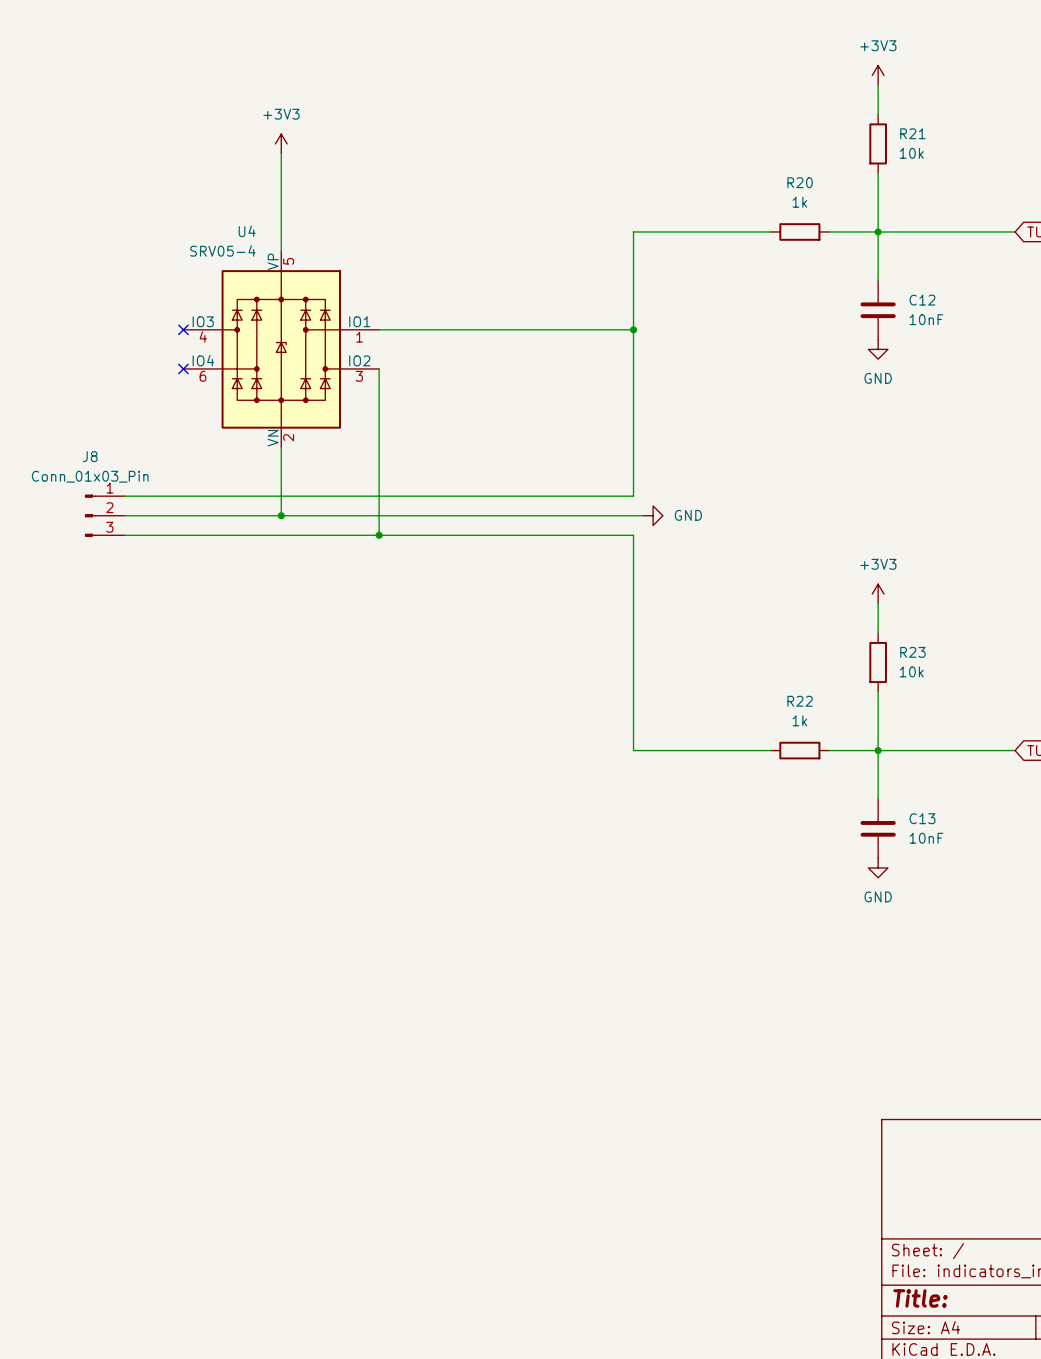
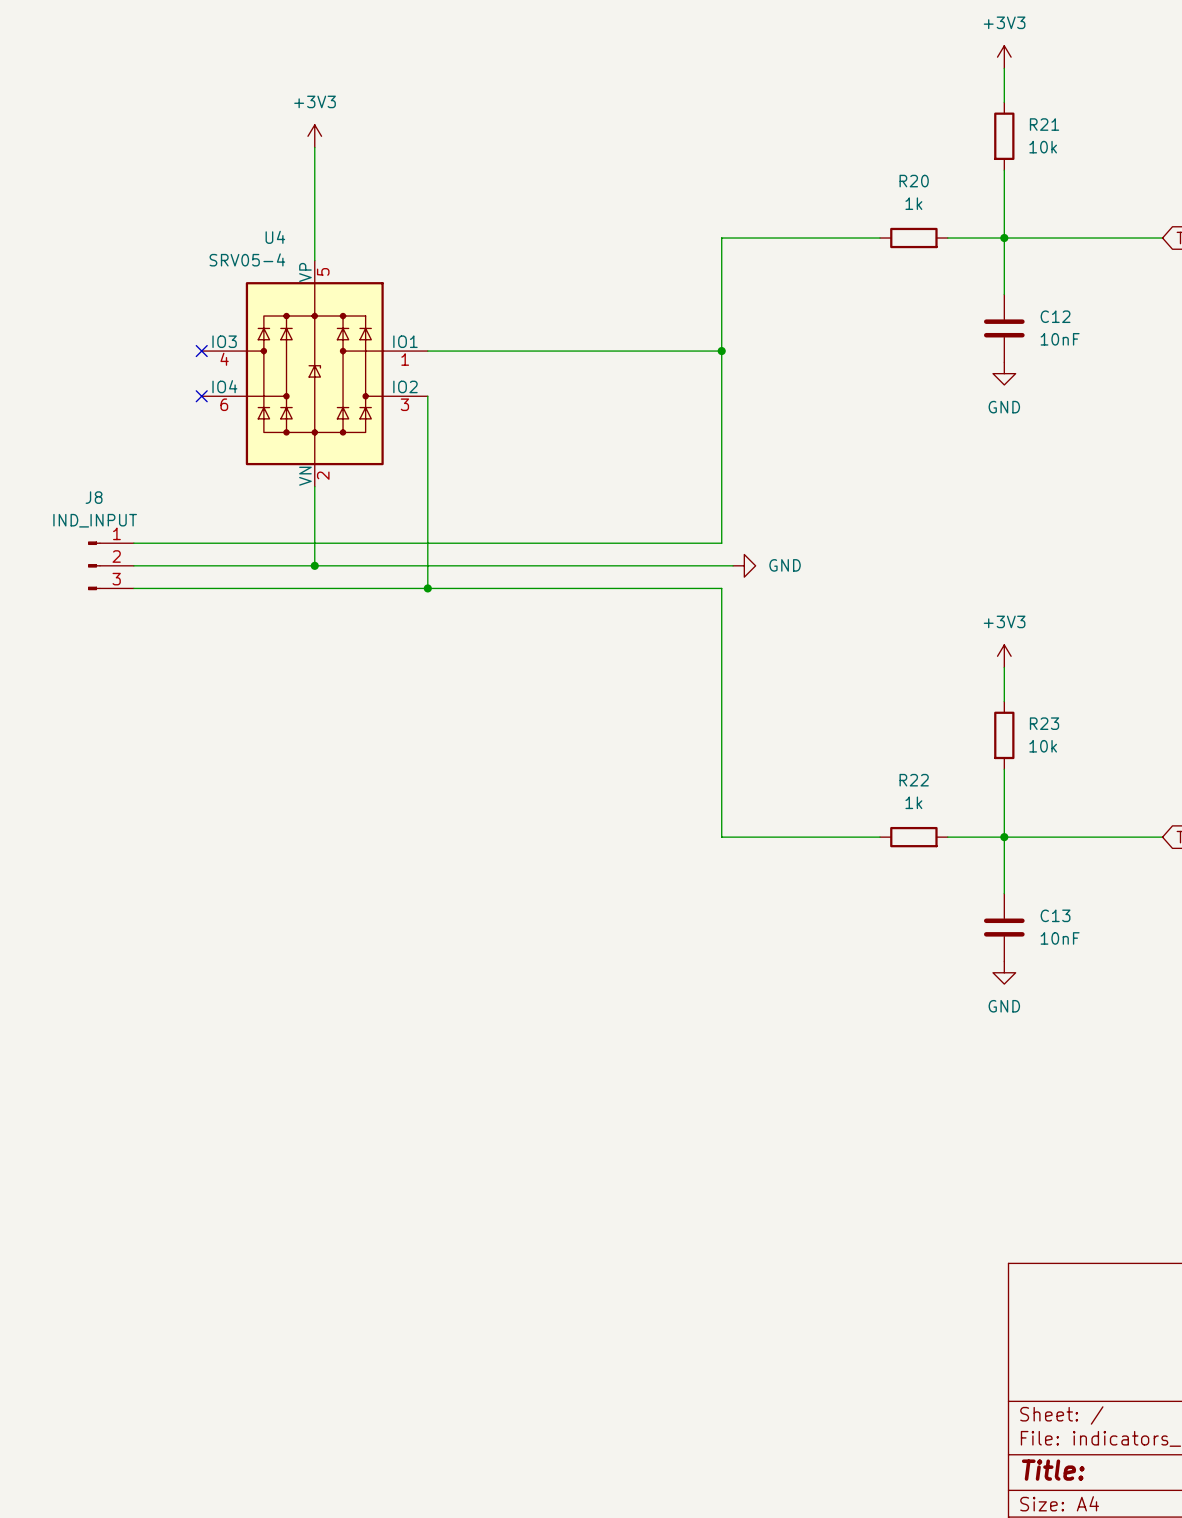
J8 value: Conn_01x03_Pin (90, 476) -> IND_INPUT (95, 520)

